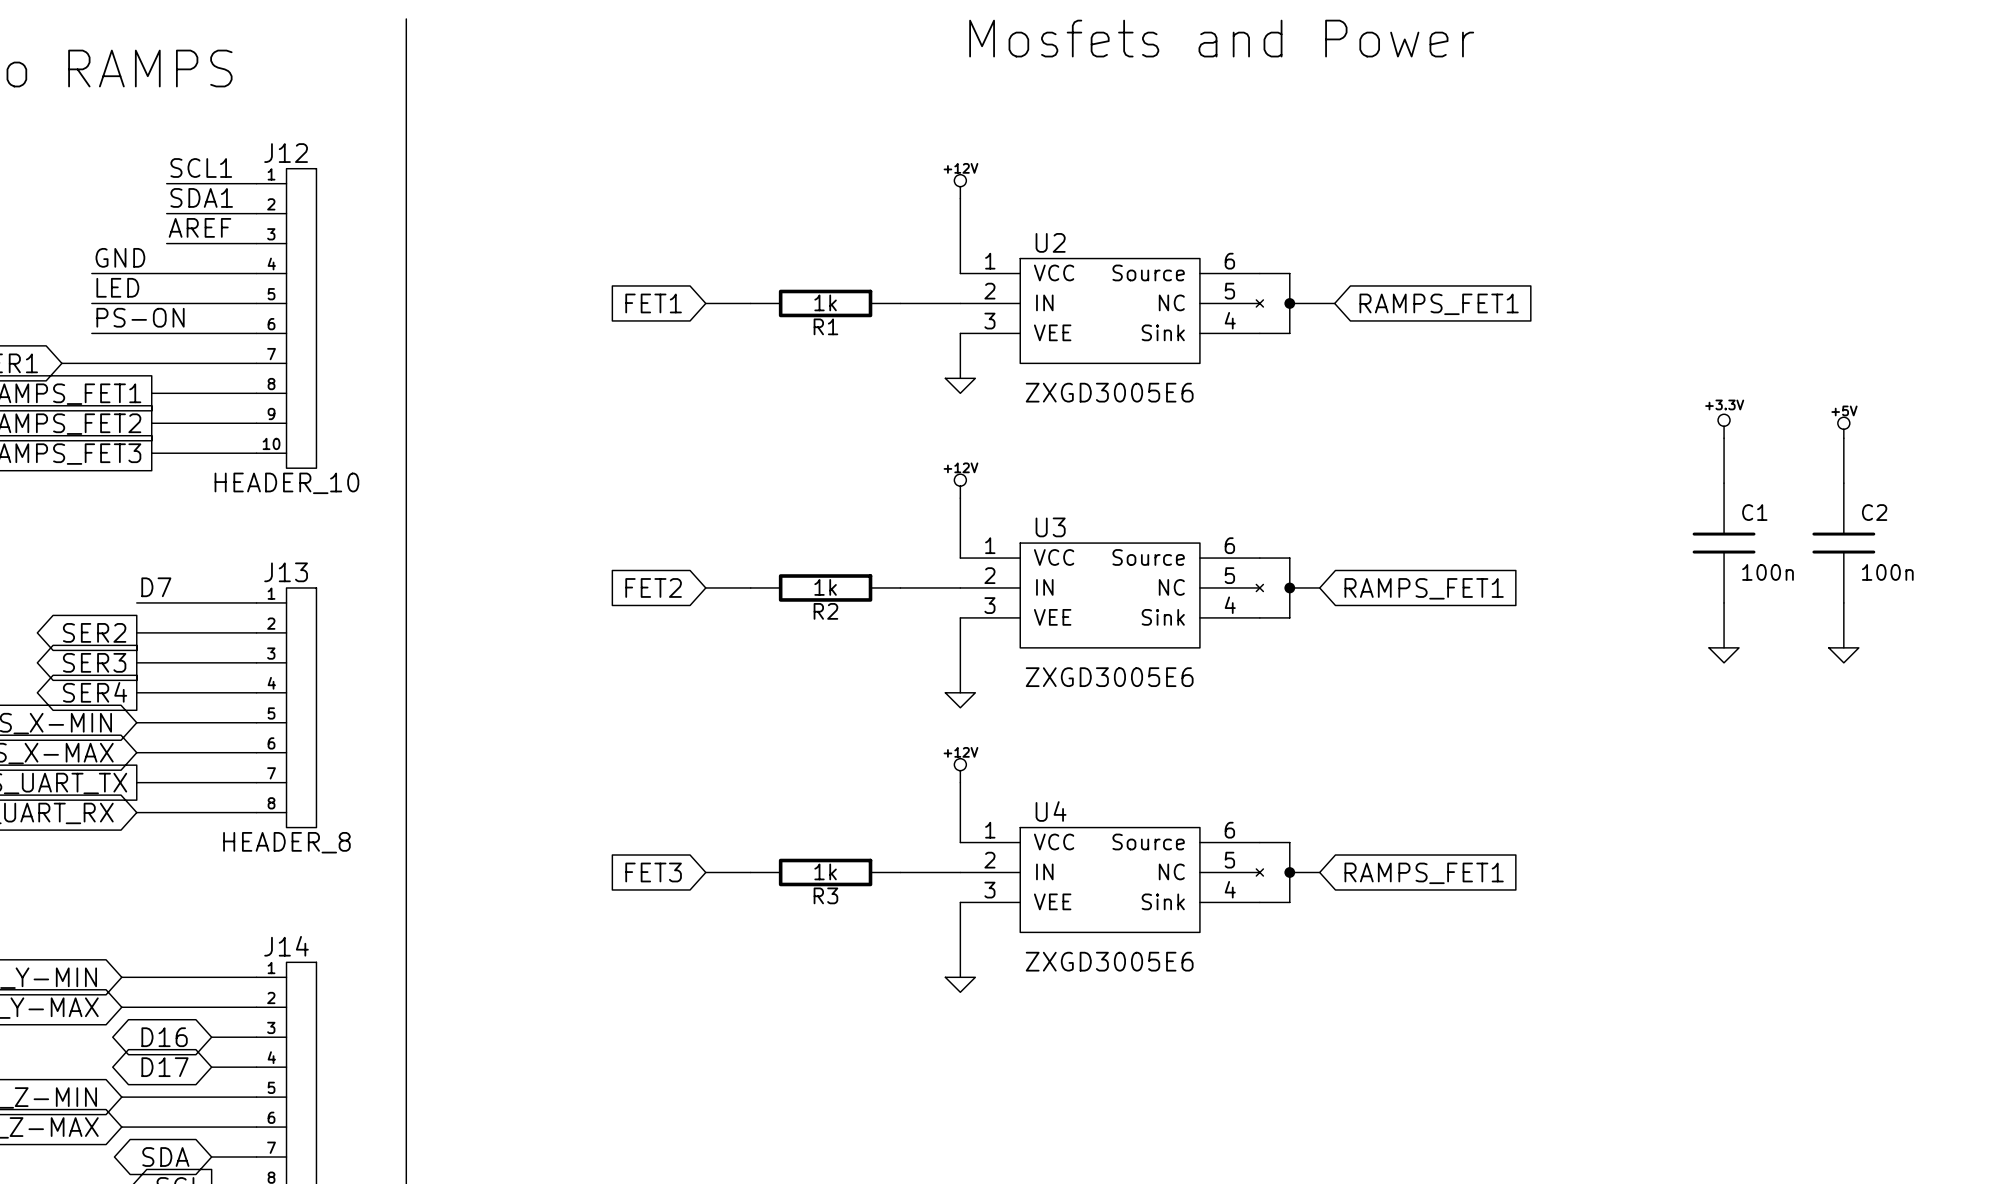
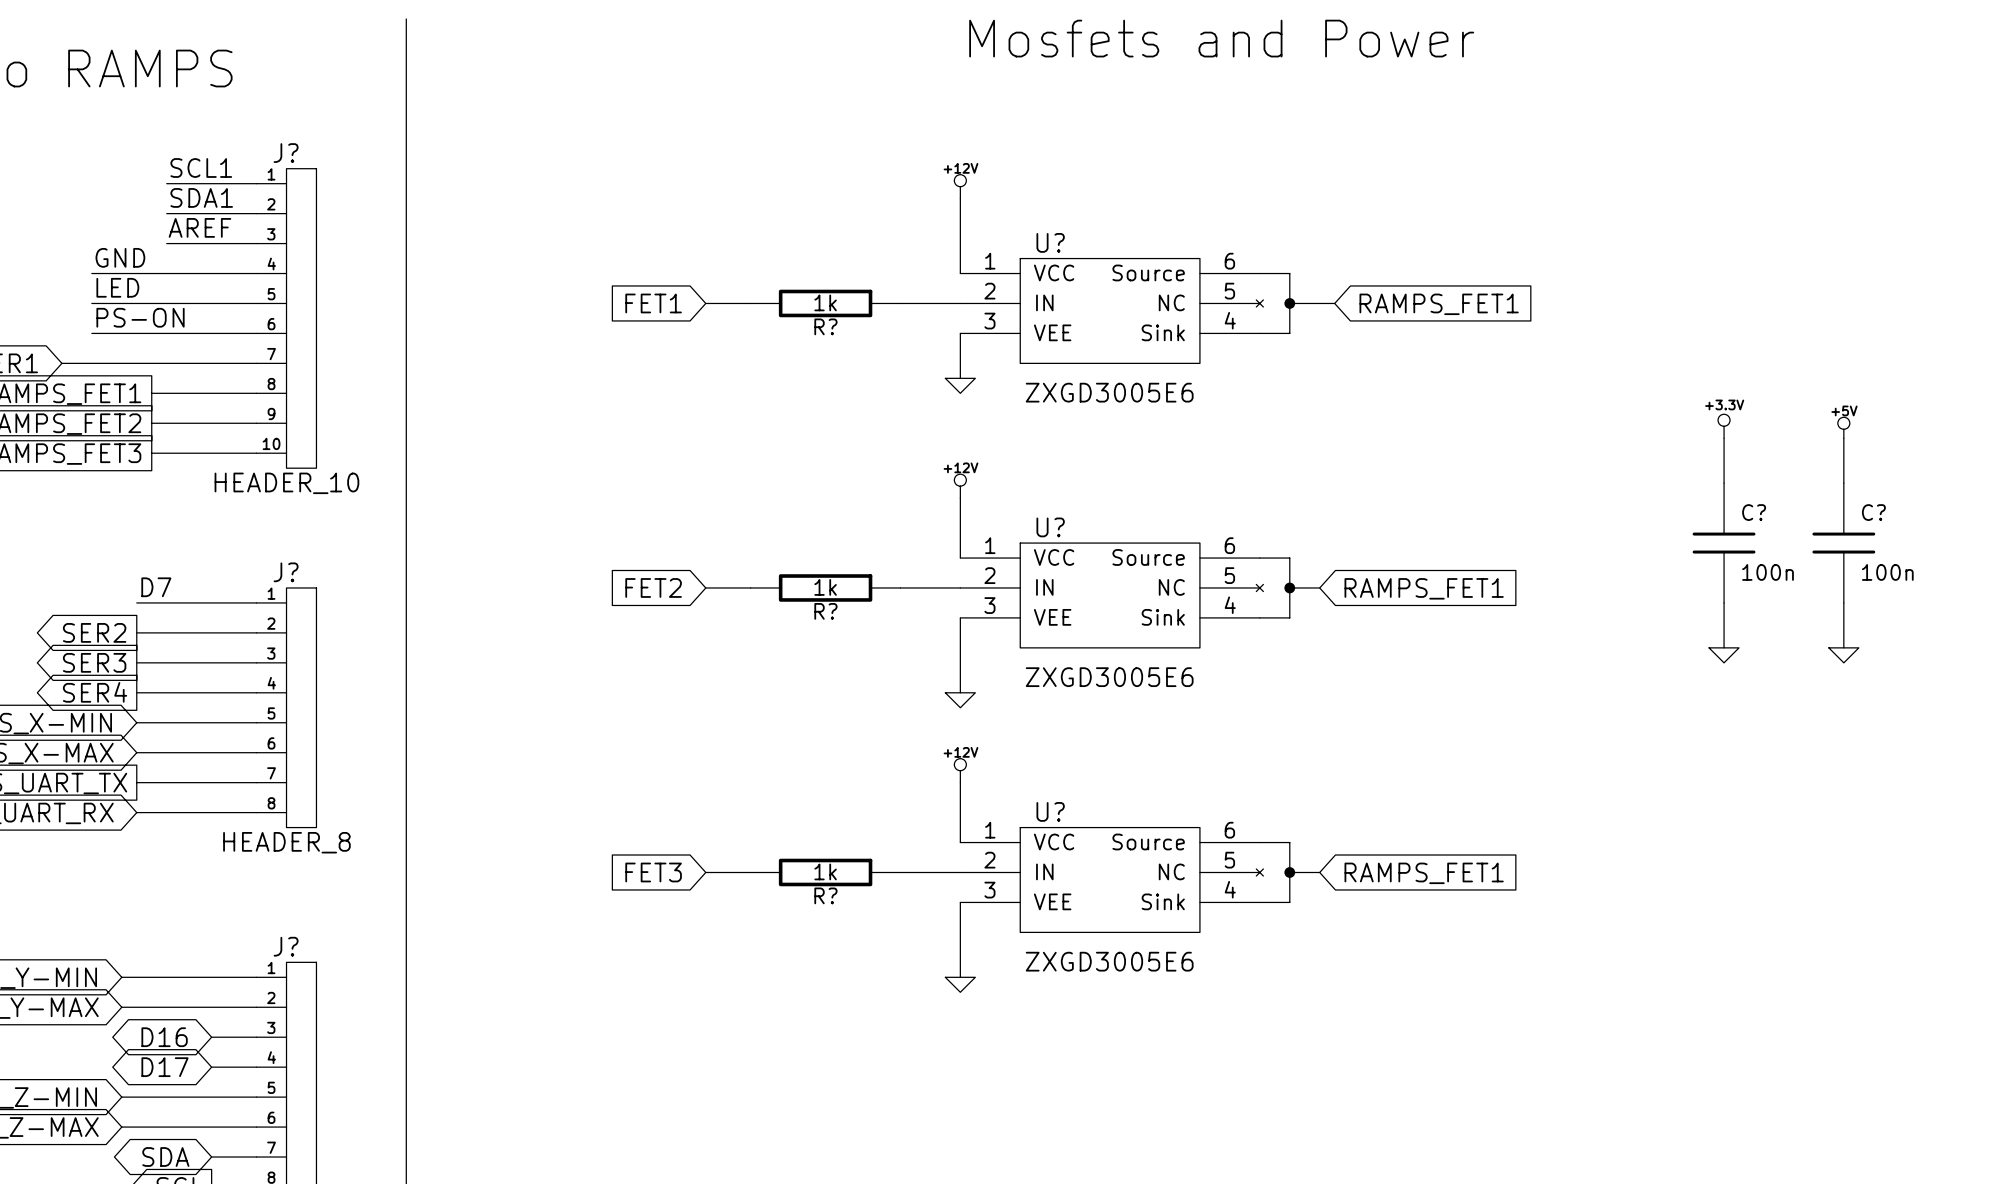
J12 name: J12 (286, 153) -> J? (286, 153)
U2 name: U2 (1050, 242) -> U? (1050, 242)
R1 name: R1 (825, 326) -> R? (825, 326)
C1 name: C1 (1754, 512) -> C? (1754, 512)
C2 name: C2 (1874, 512) -> C? (1873, 512)
U3 name: U3 (1050, 527) -> U? (1050, 527)
J13 name: J13 (286, 572) -> J? (286, 572)
R2 name: R2 (825, 611) -> R? (825, 611)
U4 name: U4 (1051, 811) -> U? (1050, 811)
R3 name: R3 (825, 895) -> R? (825, 895)
J14 name: J14 (286, 946) -> J? (286, 946)

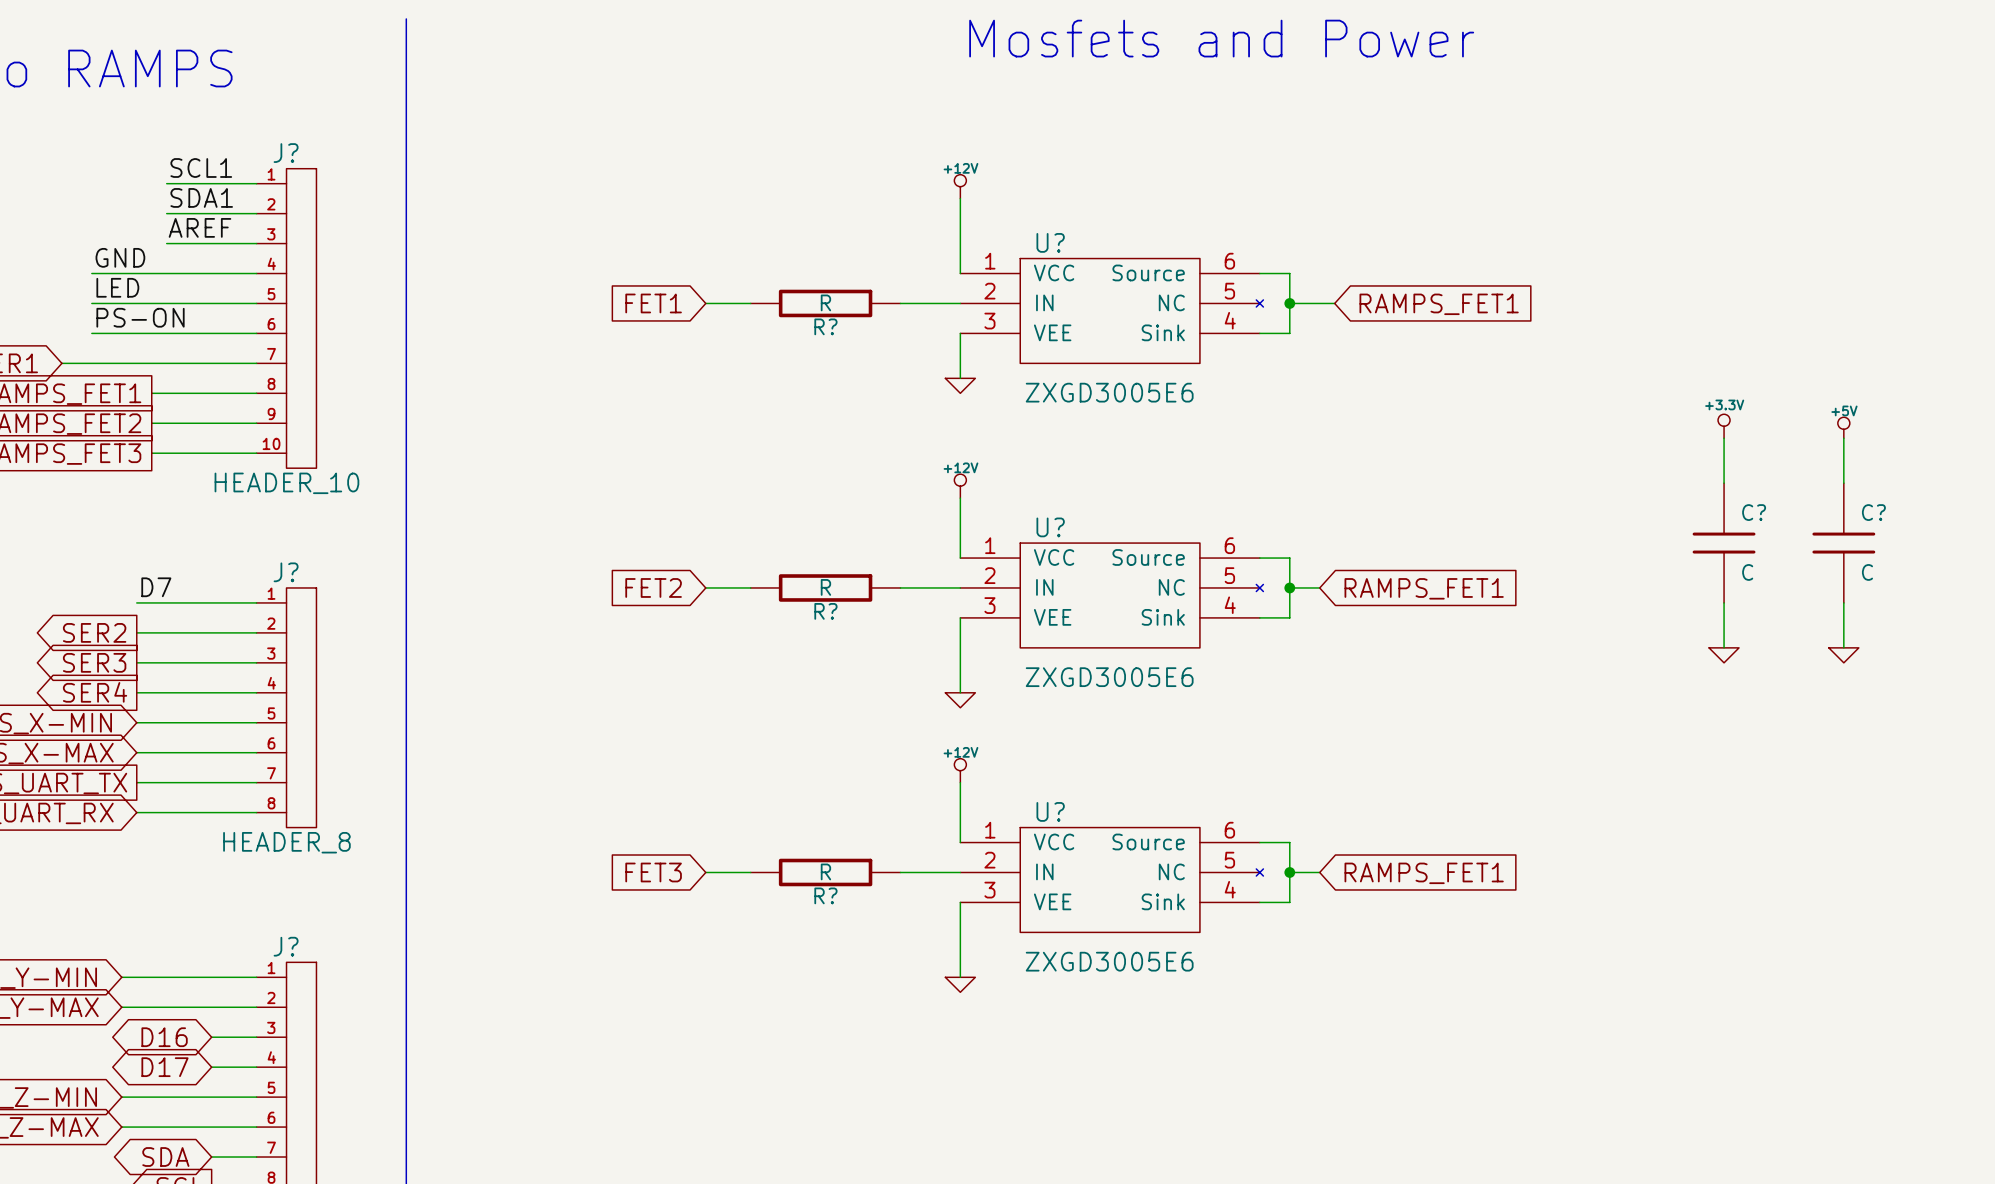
R? value: 1k (825, 302) -> R (825, 302)
C? value: 100n (1768, 572) -> C (1747, 572)
C? value: 100n (1887, 572) -> C (1867, 572)
R? value: 1k (825, 587) -> R (825, 587)
R? value: 1k (825, 871) -> R (825, 871)

